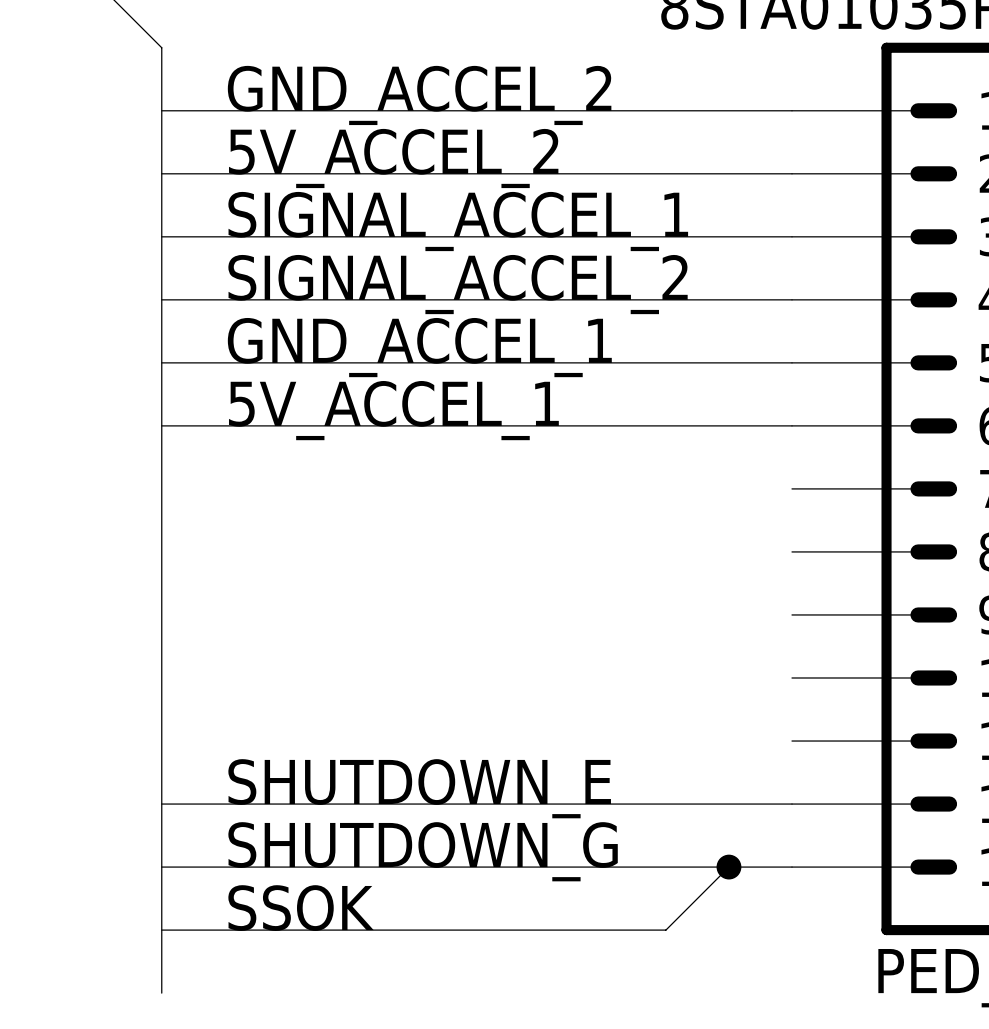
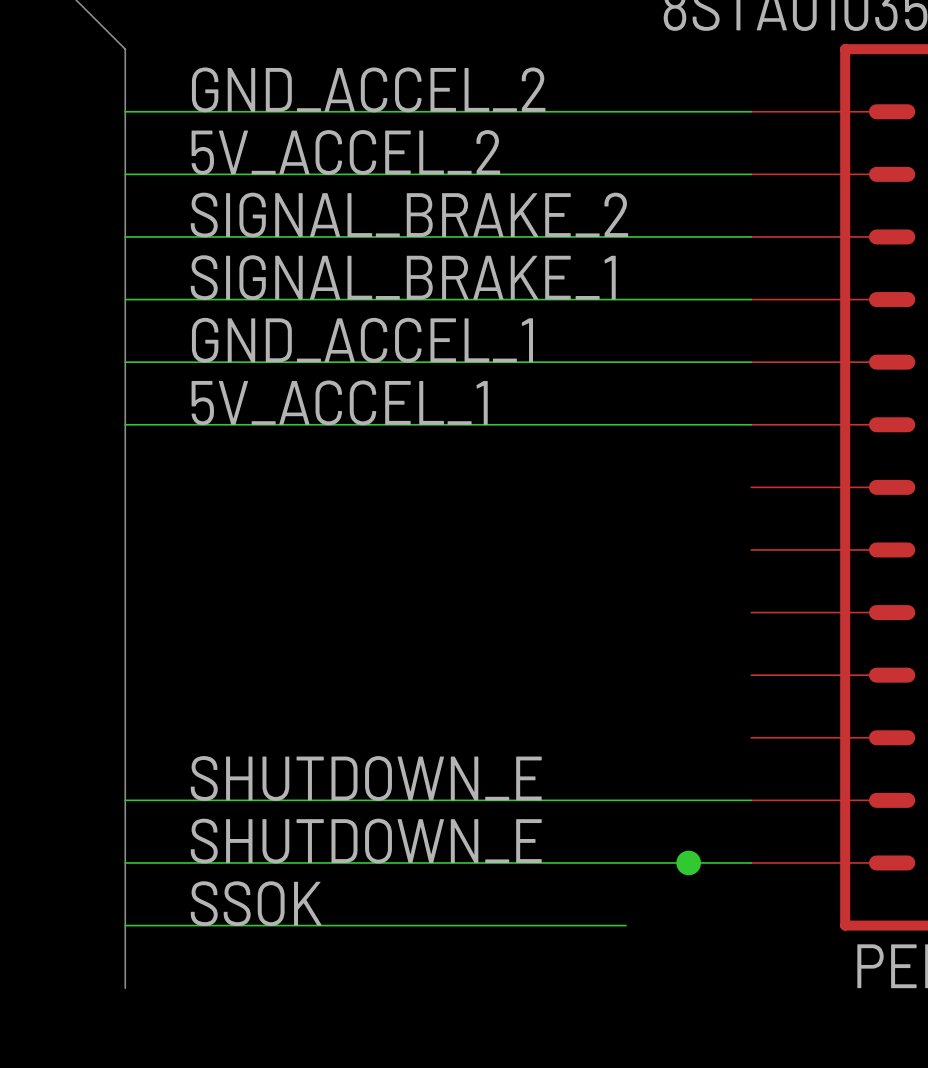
label: SIGNAL_ACCEL_1 (458, 221) -> SIGNAL_BRAKE_2 (409, 215)
label: SIGNAL_ACCEL_2 (458, 284) -> SIGNAL_BRAKE_1 (403, 277)
label: SHUTDOWN_G (423, 851) -> SHUTDOWN_E (366, 841)
wire: (728, 867) (665, 930) -> none

